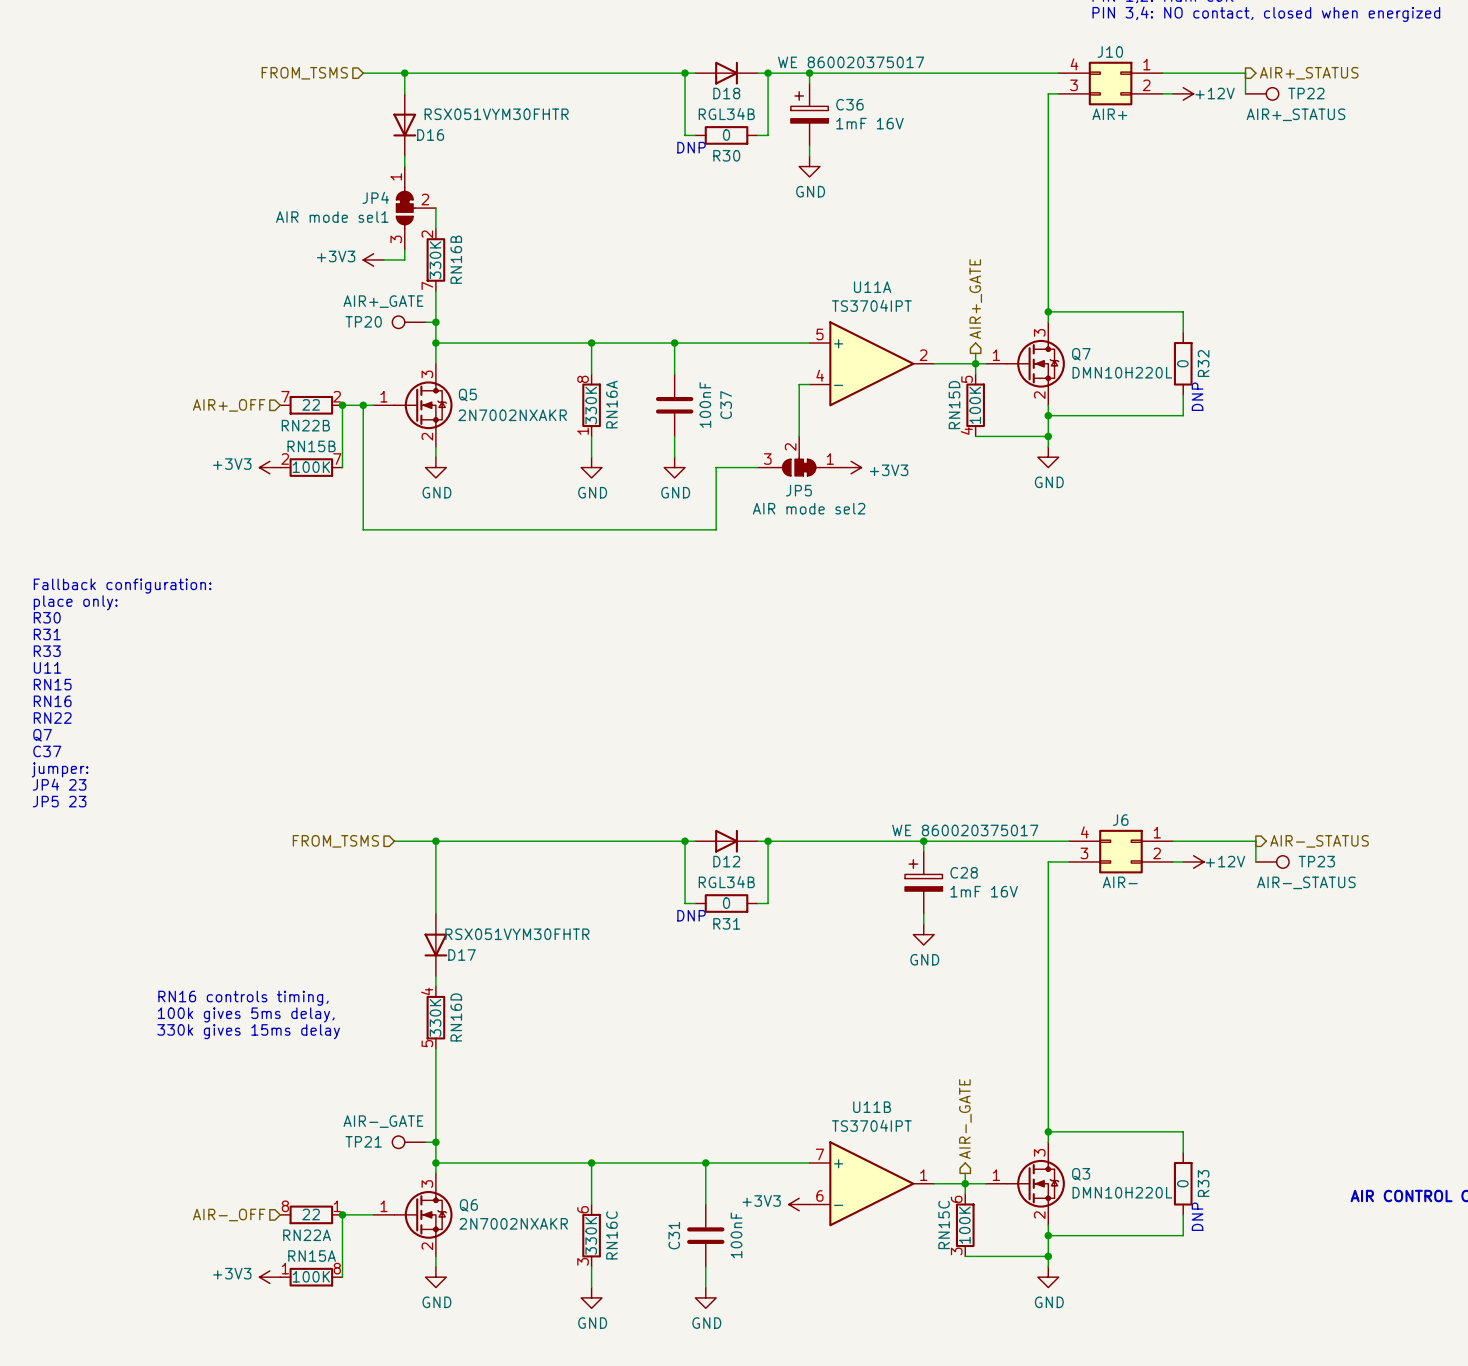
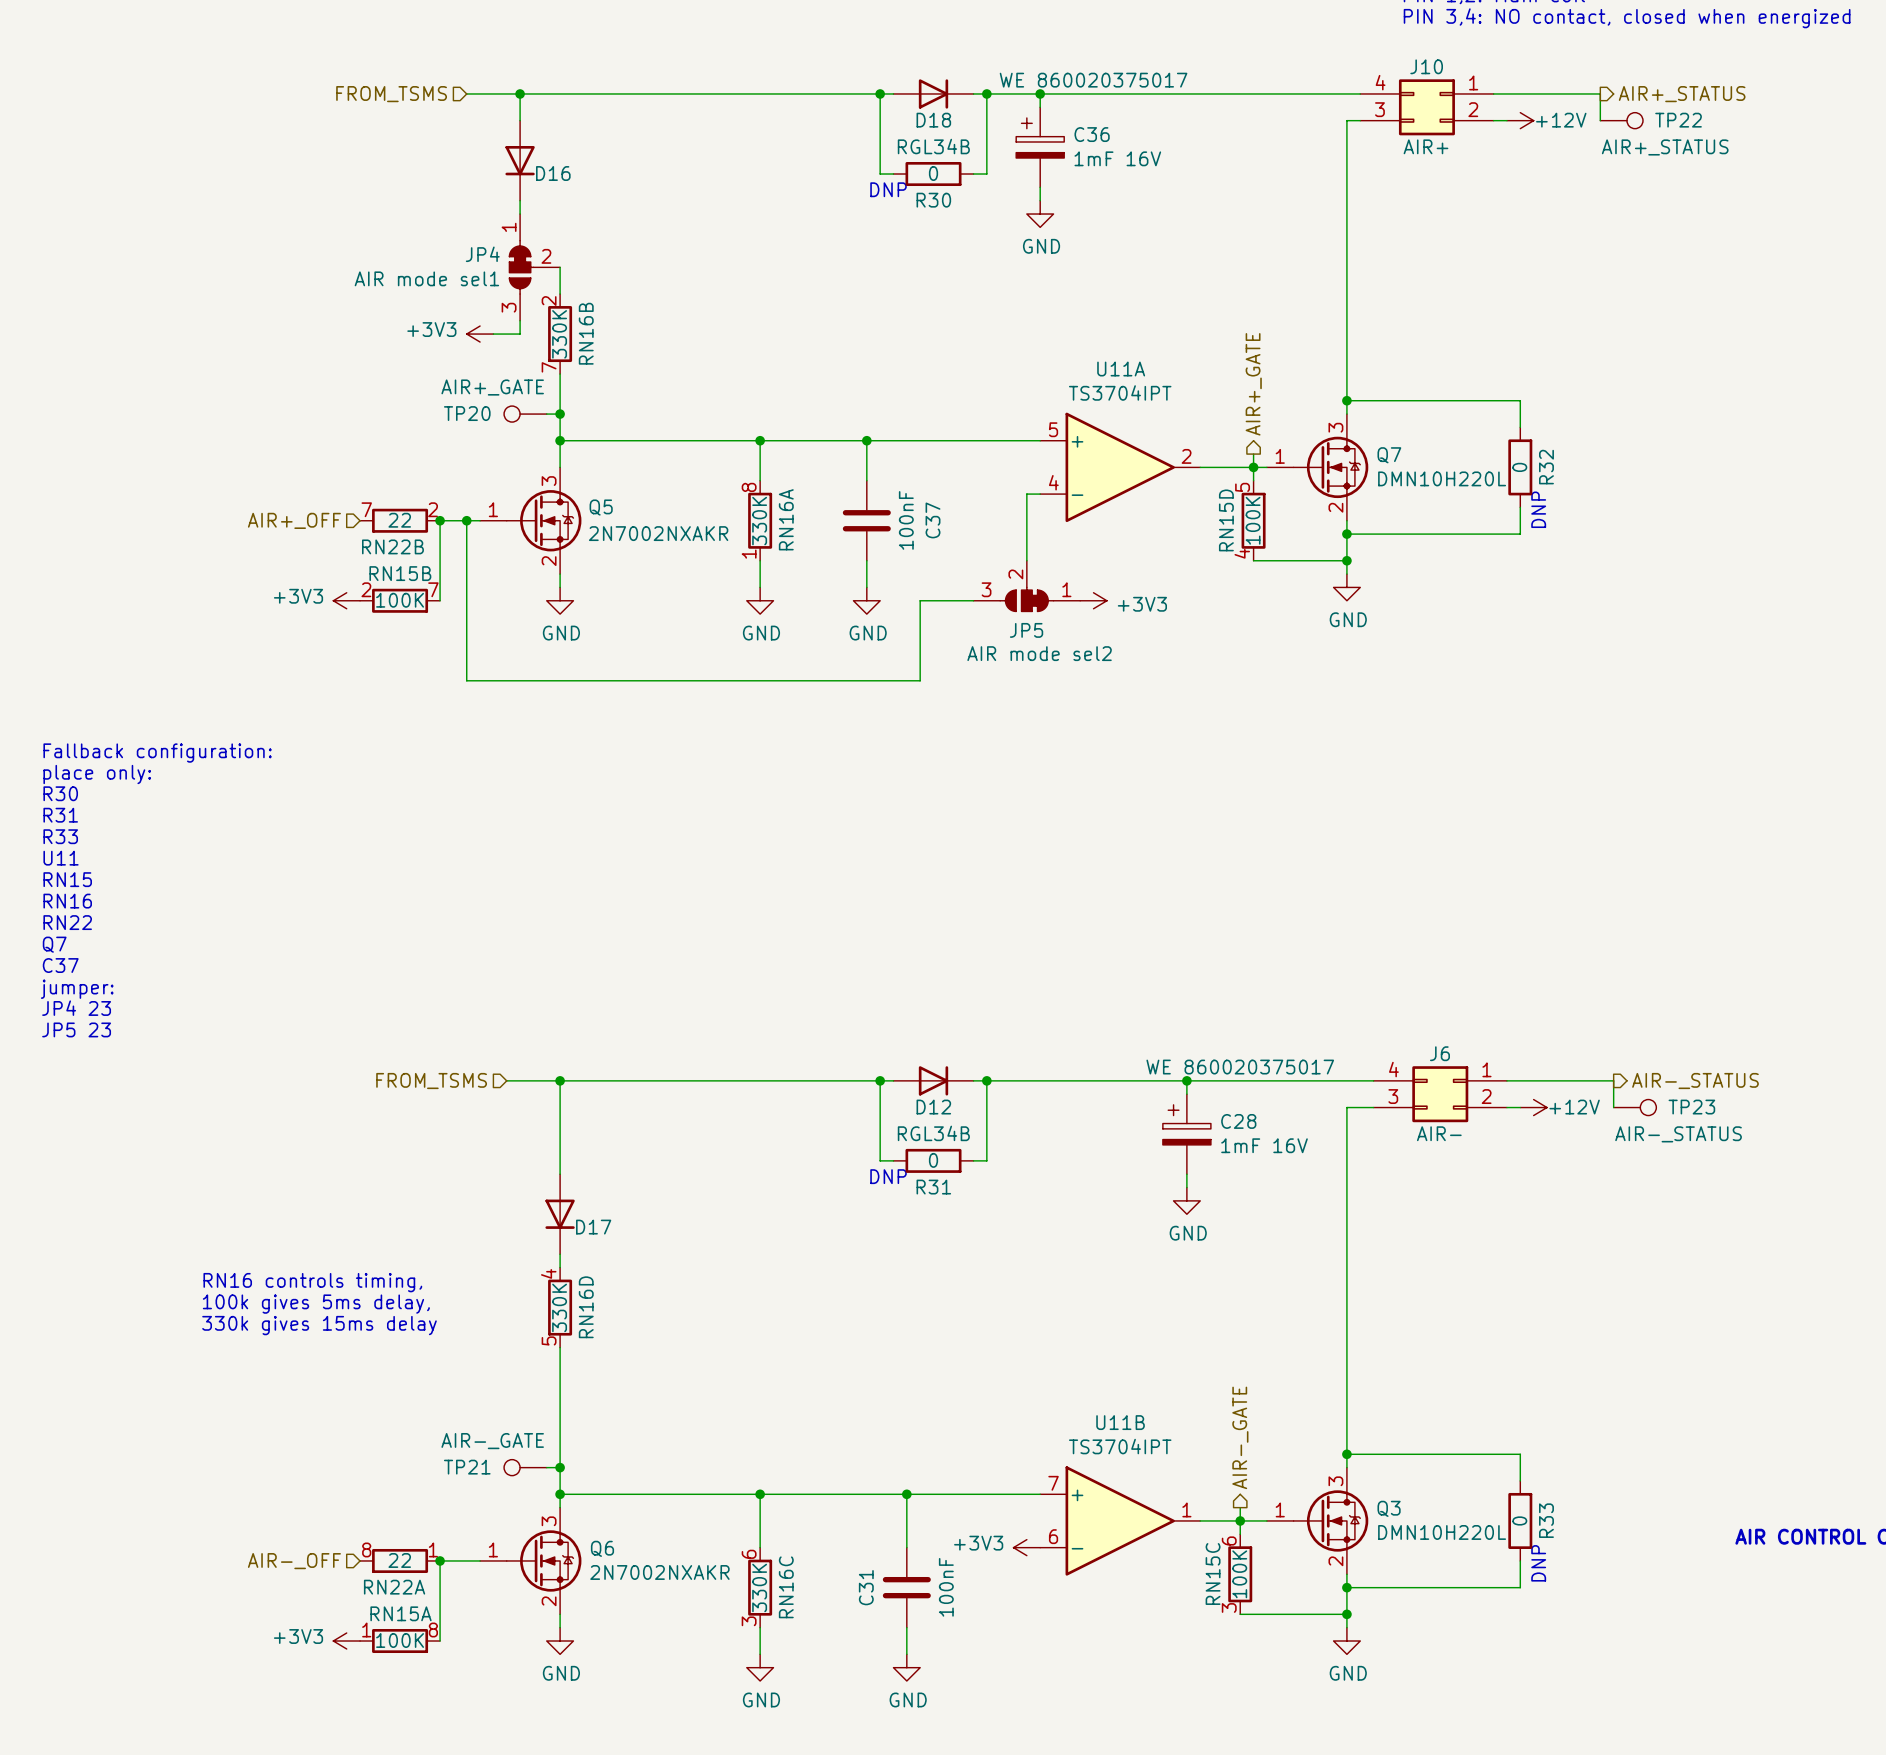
D16 value: RSX051VYM30FHTR (496, 114) -> none
D17 value: RSX051VYM30FHTR (517, 934) -> none

